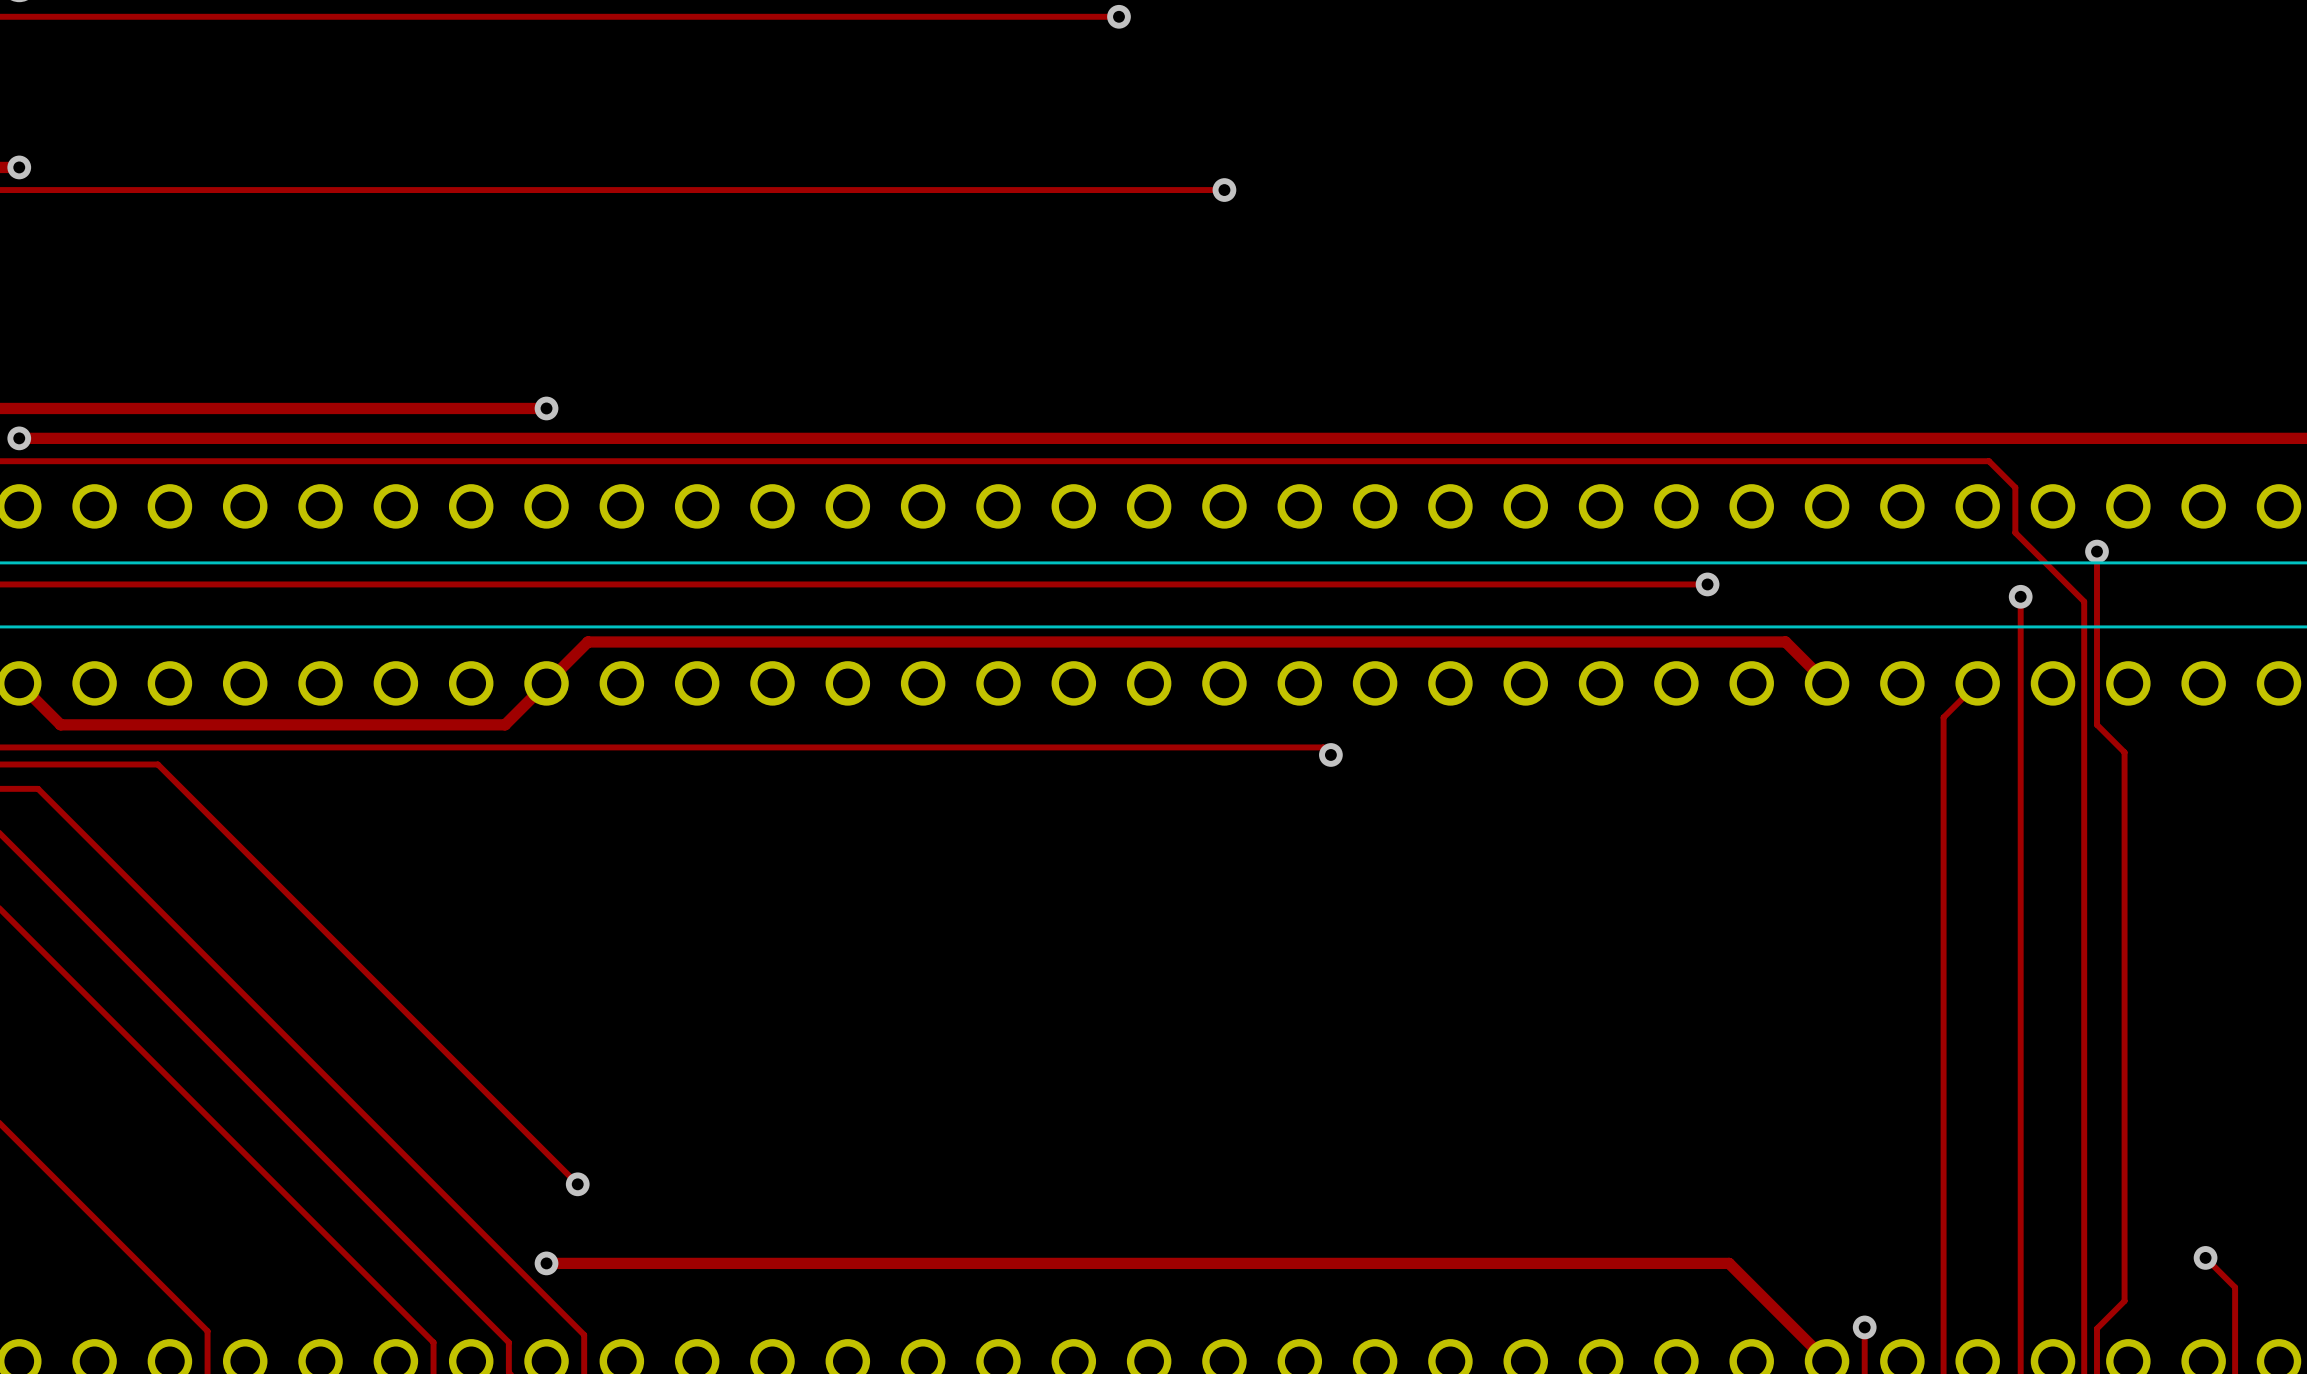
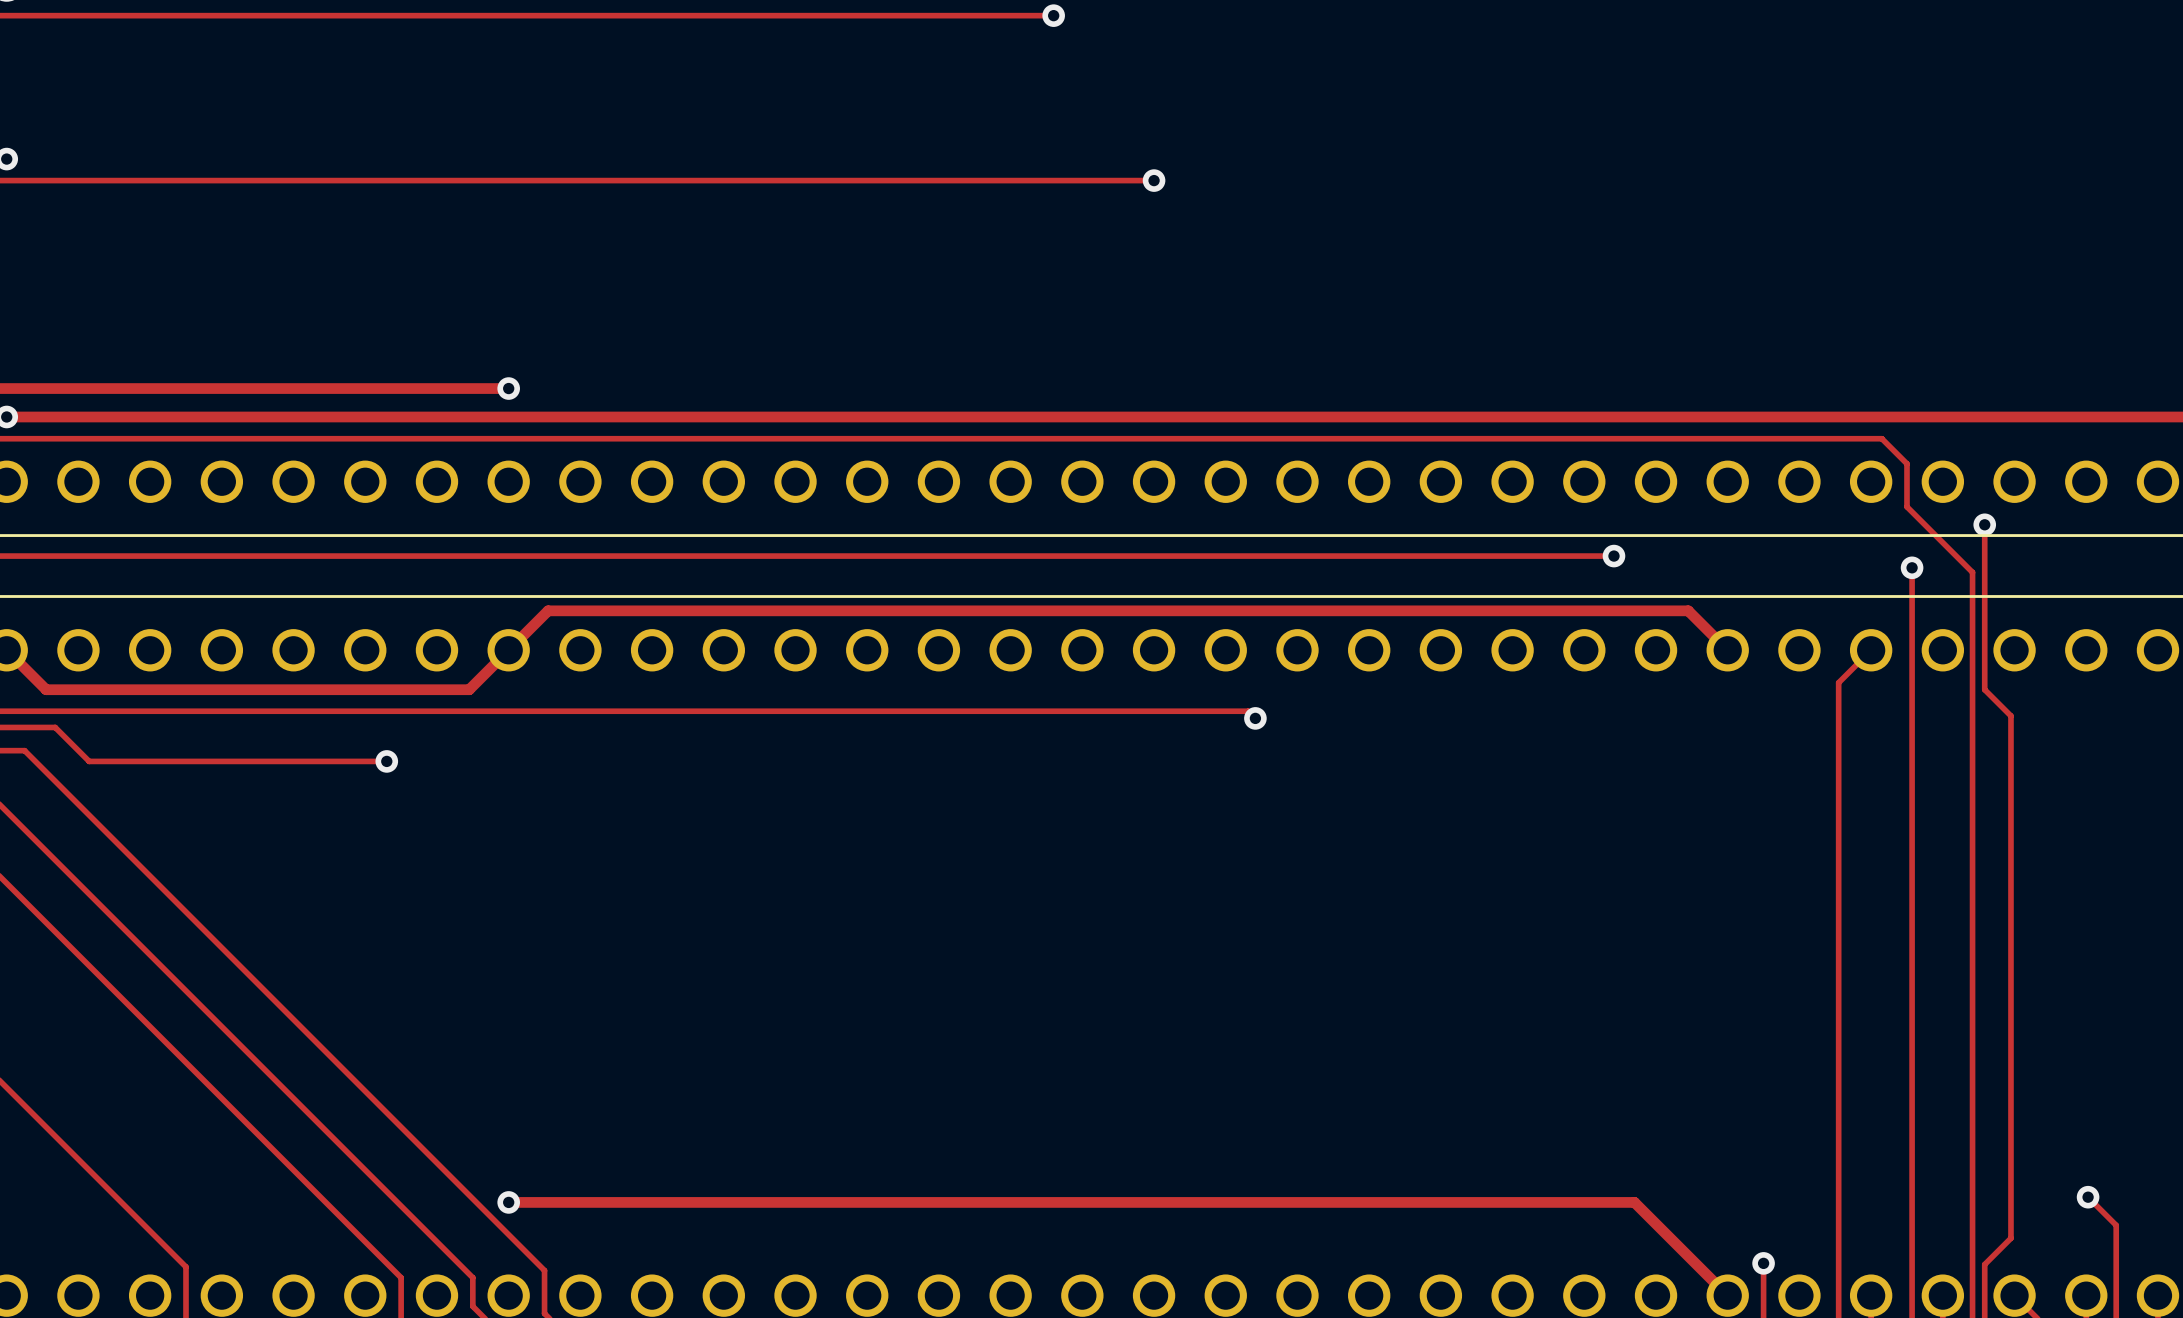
track: (70, 764) (157, 764) (577, 1184) -> (55, 727) (89, 761) (386, 761)
via: none -> (386, 761)
via: (577, 1184) -> none

